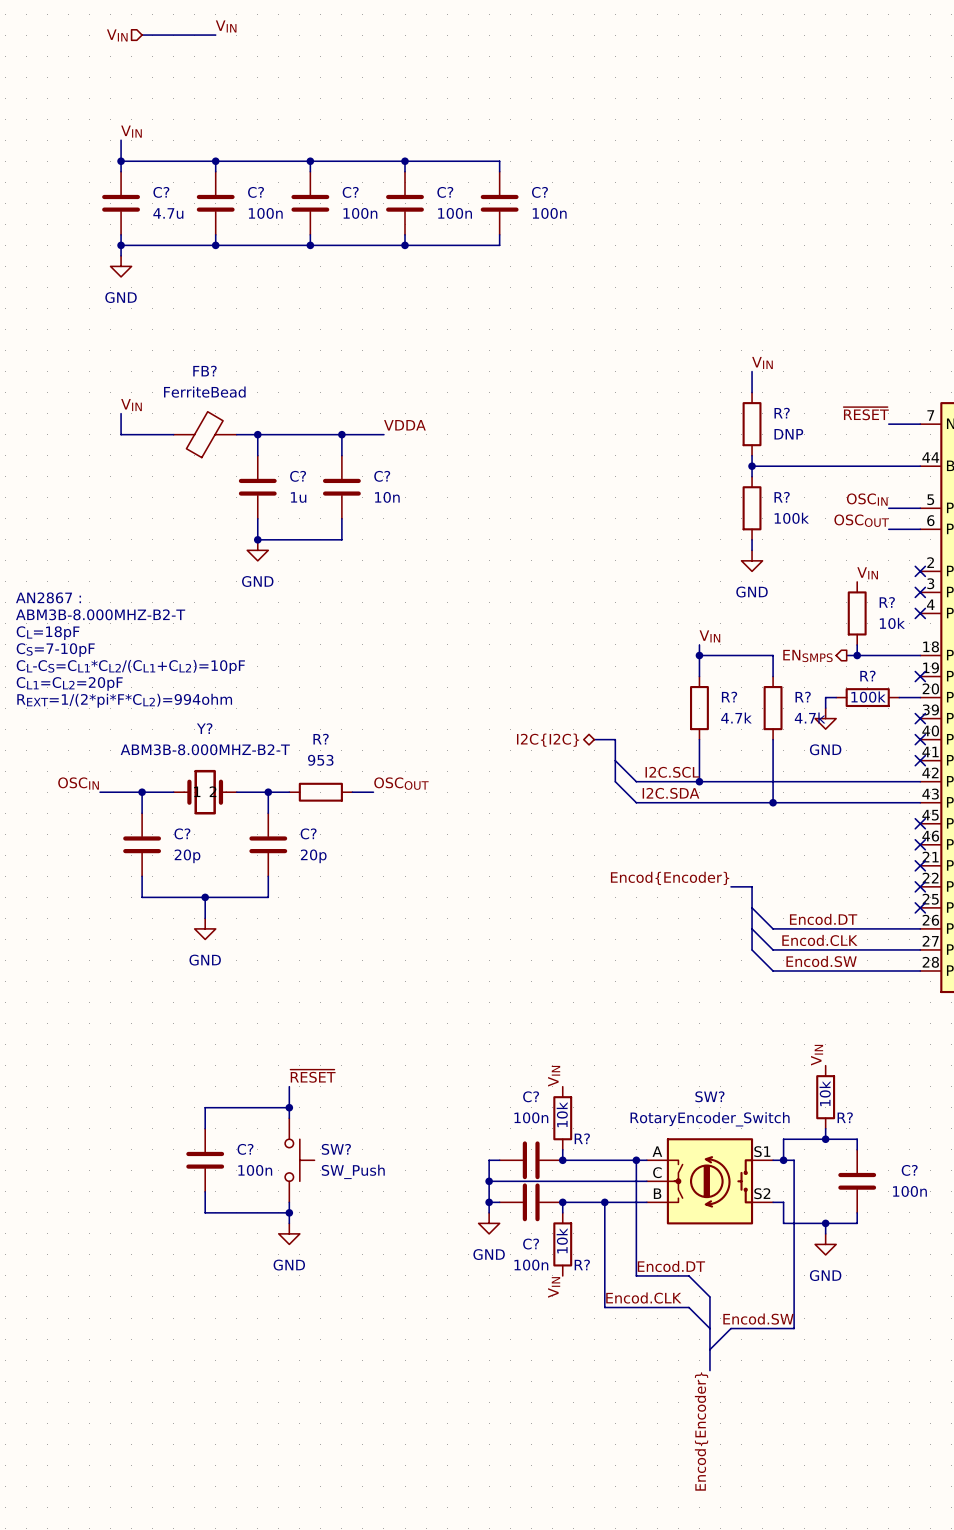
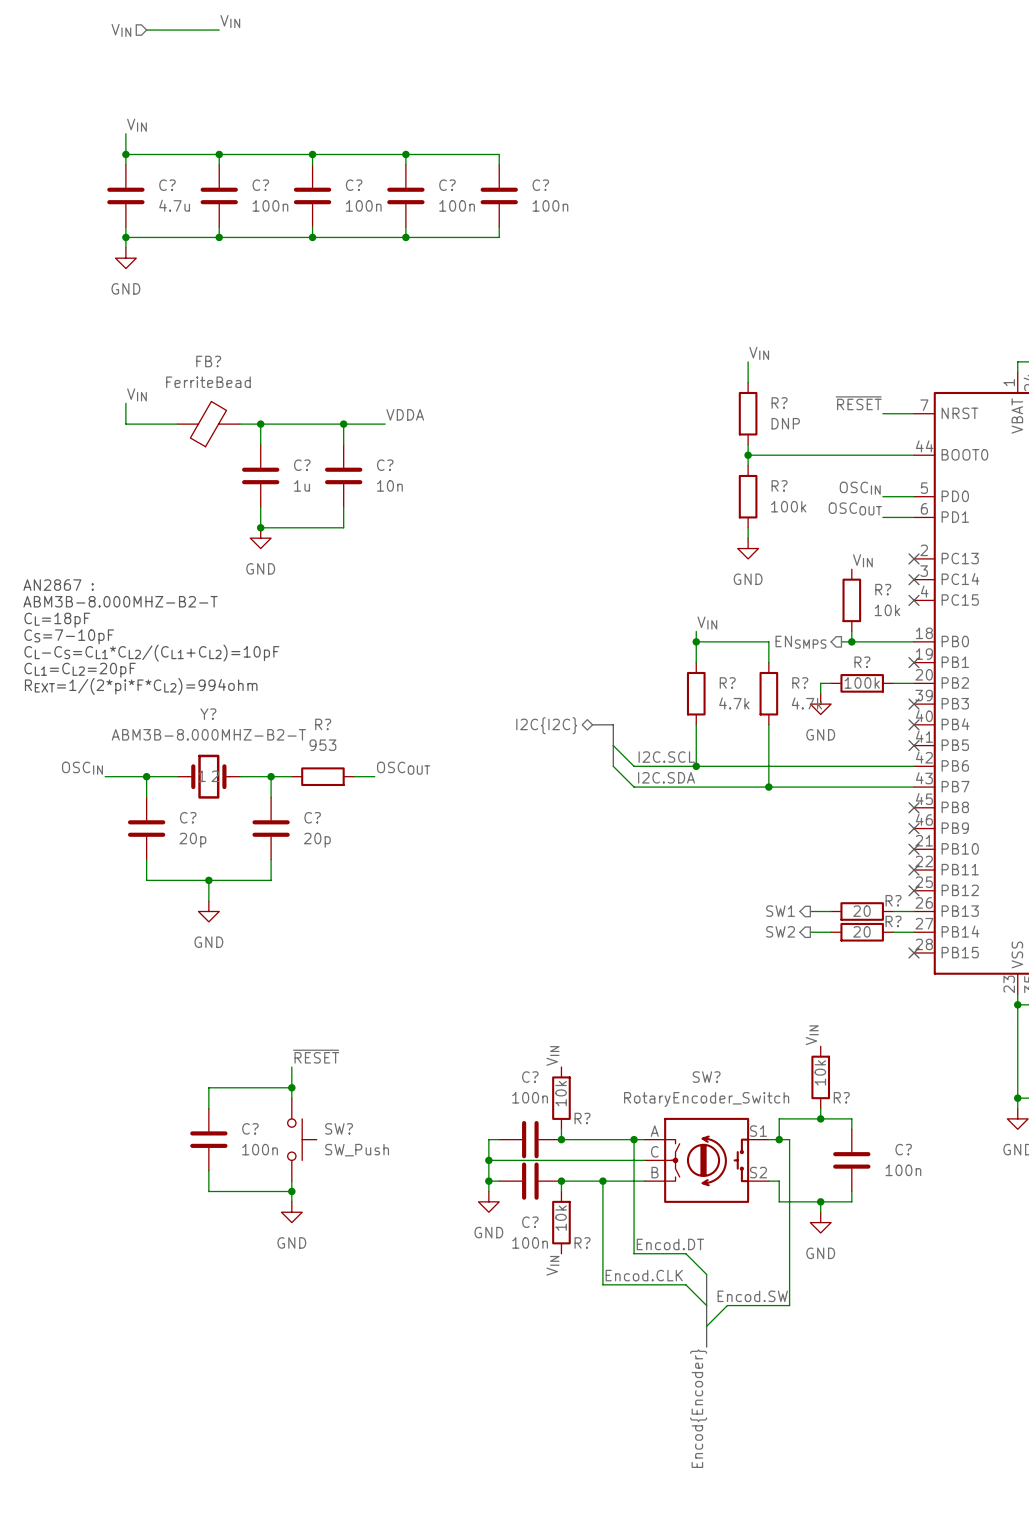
label: Encod{Encoder} (670, 878) -> none
bus: (731, 886) (752, 886) (752, 949) -> none
wire: (752, 907) (773, 928) (815, 928) -> none
label: Encod.DT (823, 919) -> none
wire: (752, 928) (773, 949) (815, 949) -> none
hierarchical label: none -> SW1 (780, 911)
wire: (836, 928) (899, 928) -> none
R?: none -> 20 (862, 911)
label: Encod.CLK (819, 940) -> none
wire: (752, 949) (773, 970) (920, 970) -> none
hierarchical label: none -> SW2 (780, 931)
wire: (836, 949) (899, 949) -> none
R?: none -> 20 (862, 932)
label: Encod.SW (821, 961) -> none
no-connect mark: none -> (914, 952)

